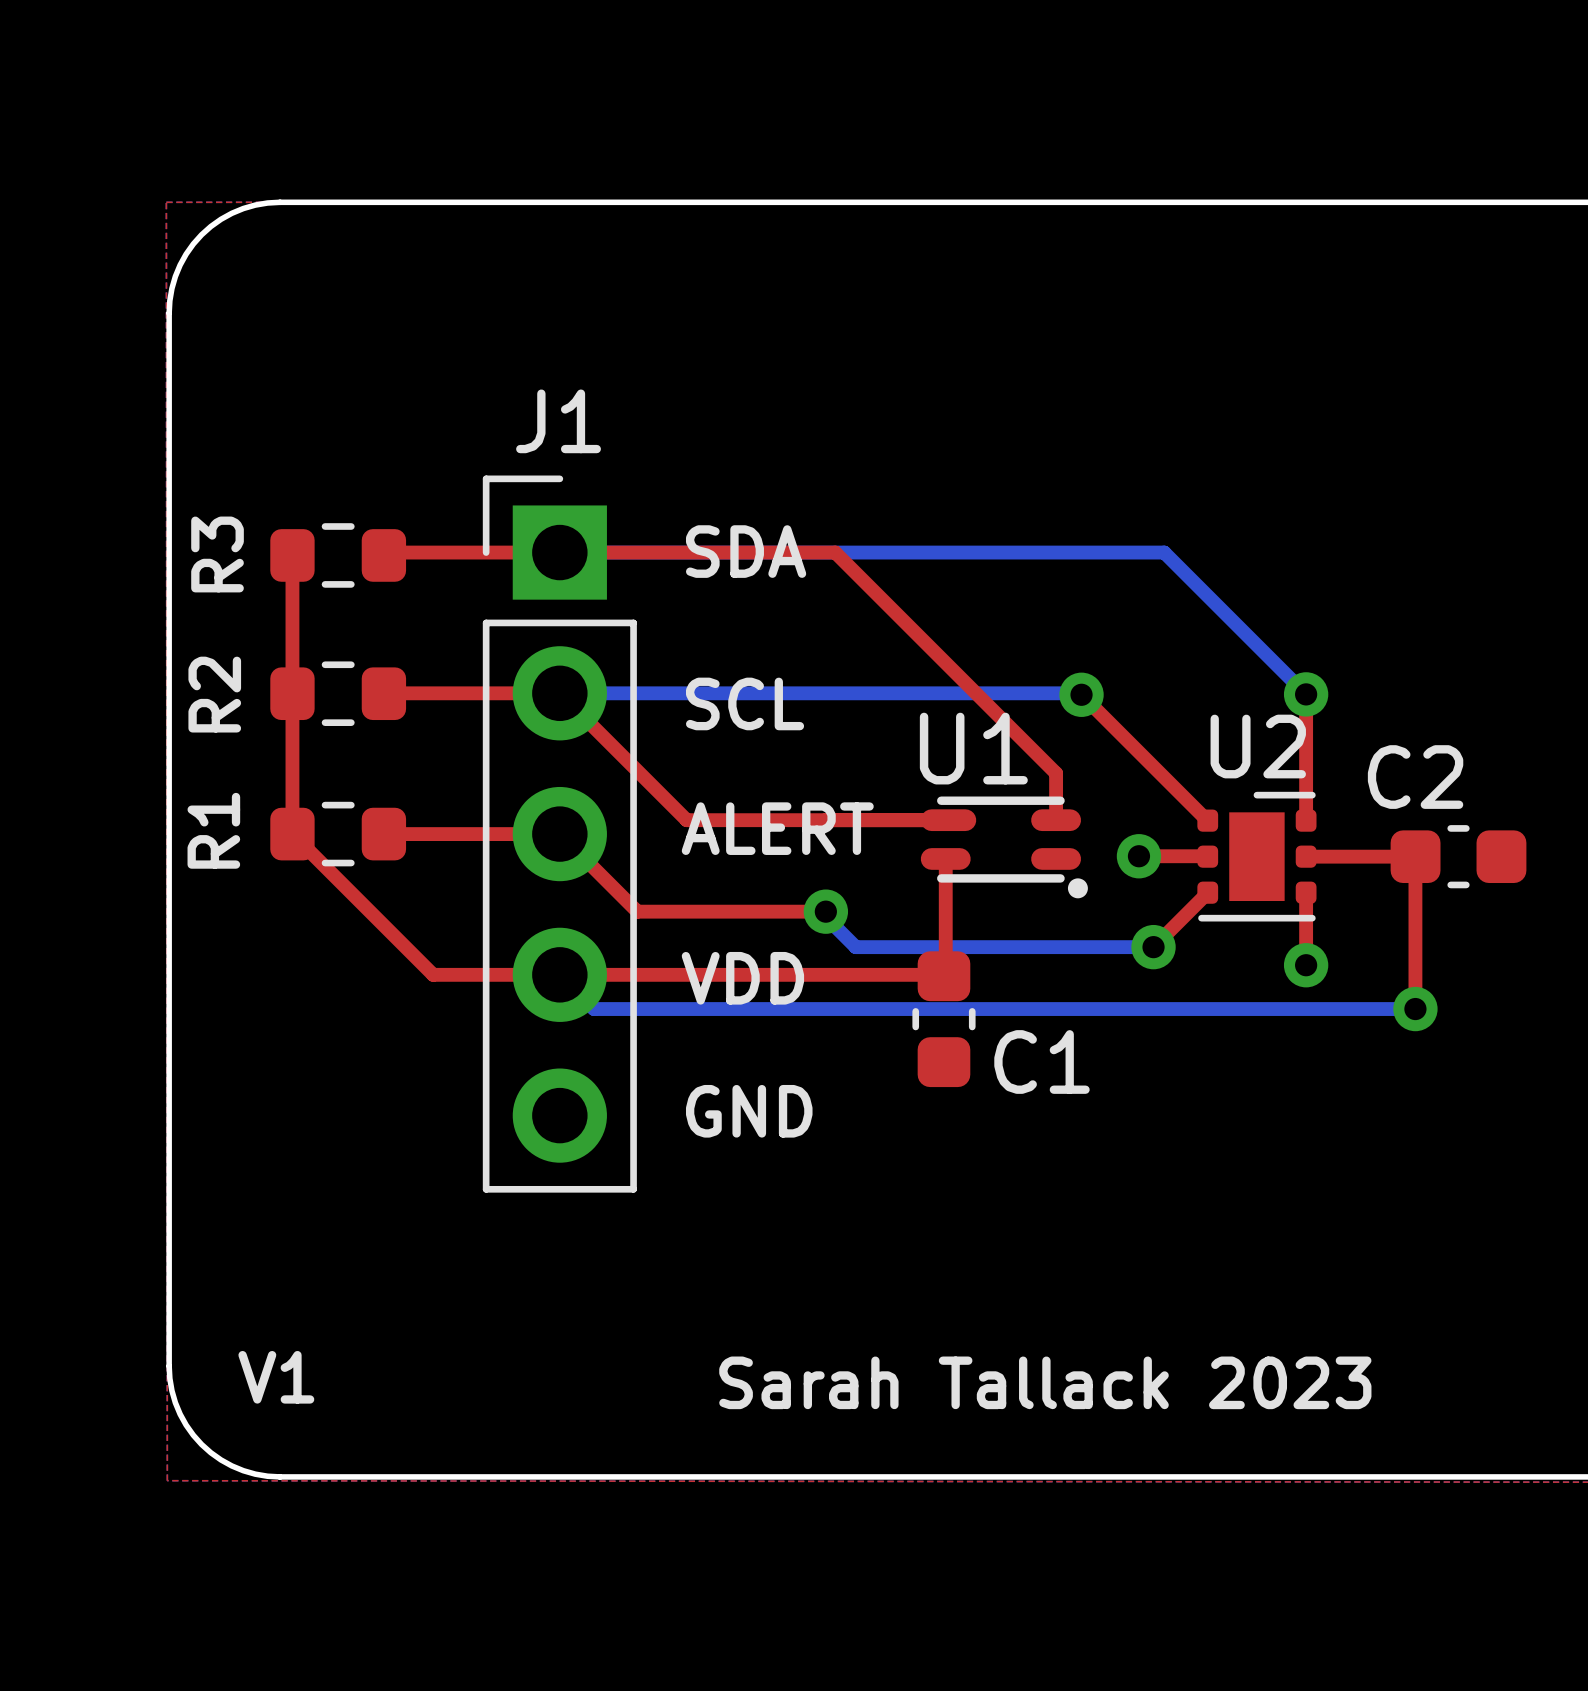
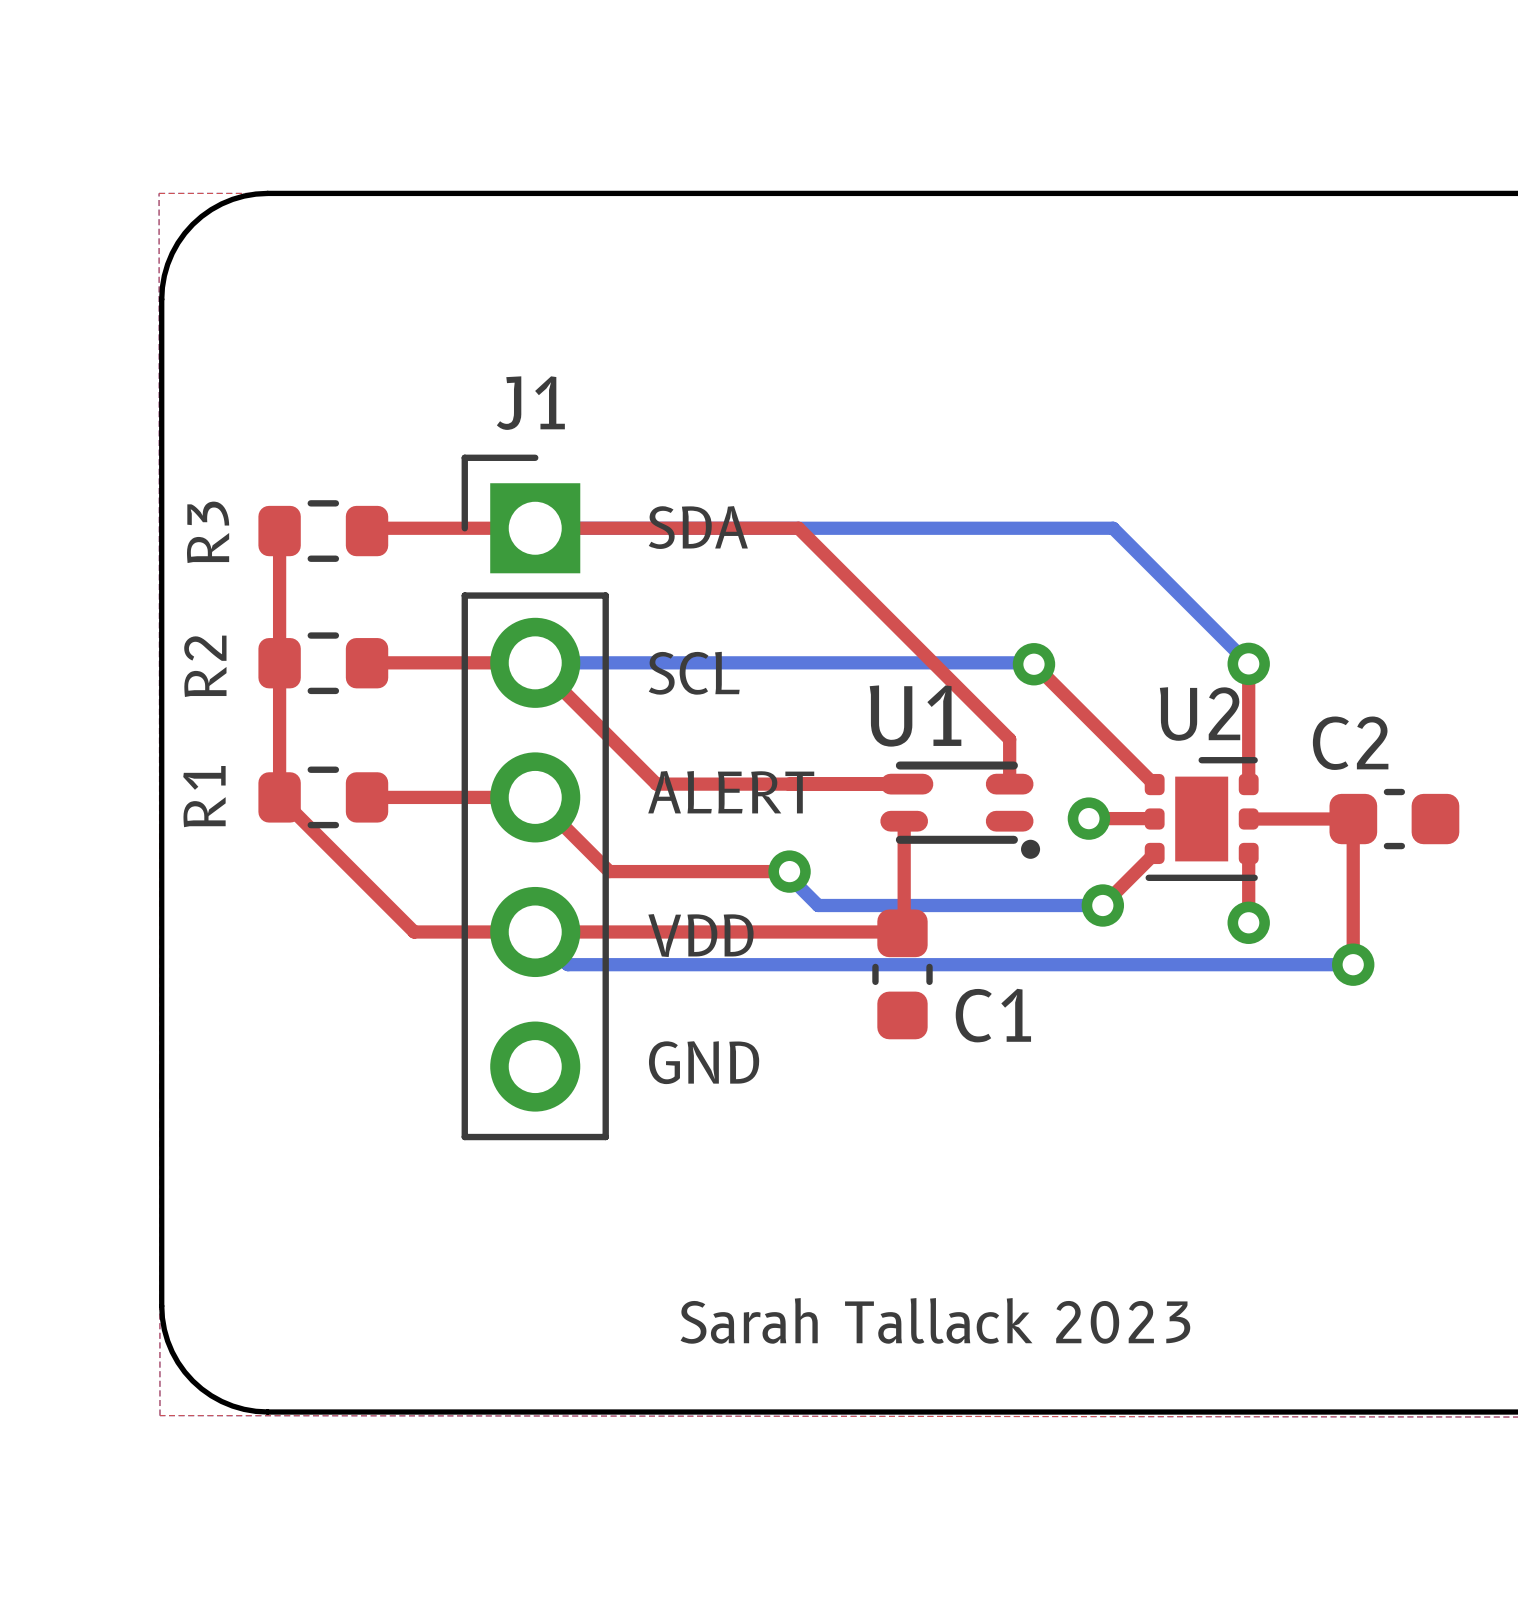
text: V1 (276, 1377) -> none

